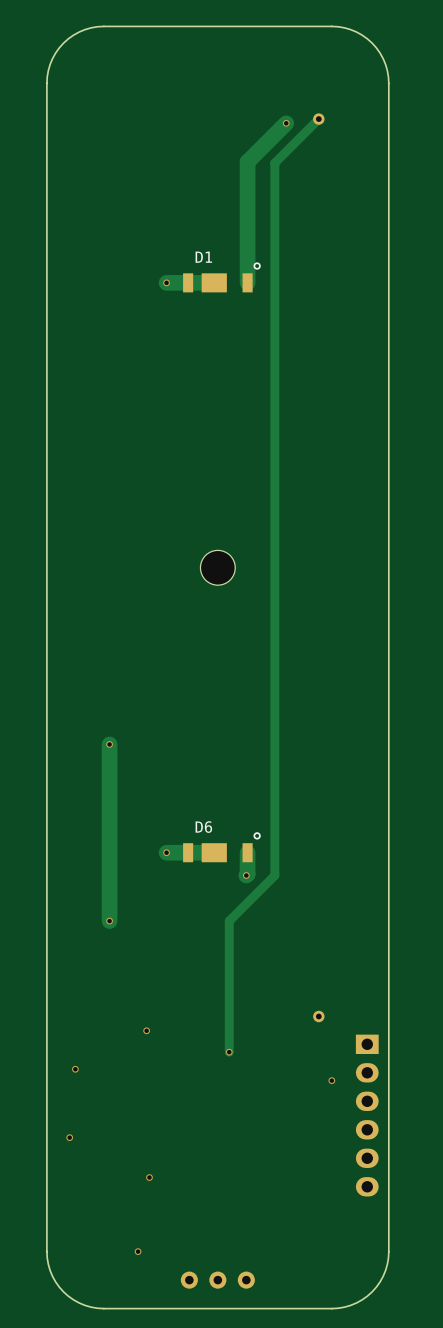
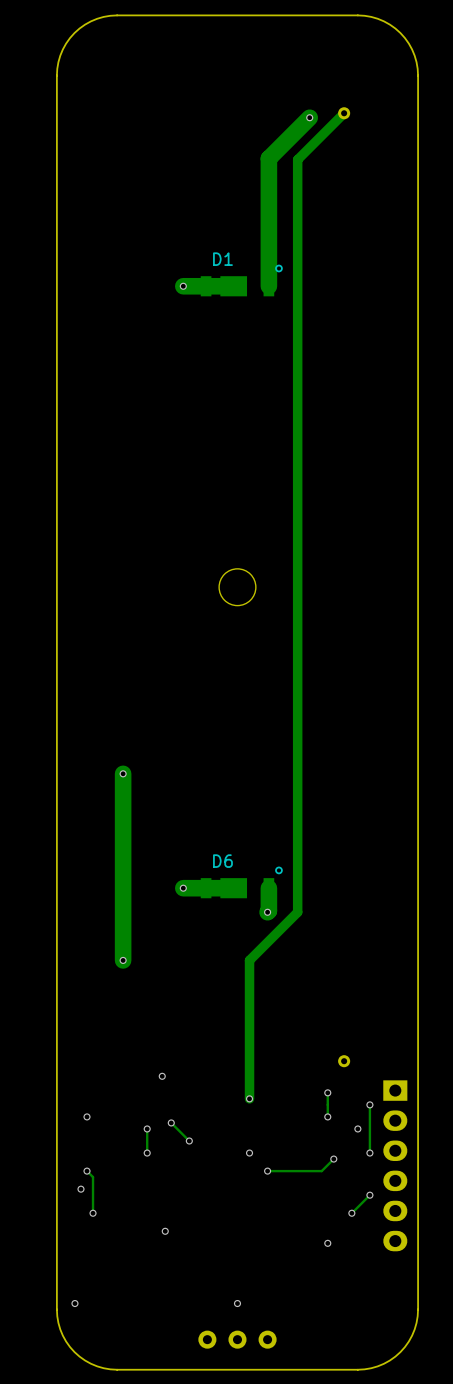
track: none -> (327, 1092) (327, 1116)
via: none -> (327, 1092)
track: none -> (369, 1104) (369, 1153)
via: none -> (369, 1104)
via: none -> (327, 1116)
track: none -> (171, 1122) (189, 1141)
via: none -> (171, 1122)
track: none -> (147, 1128) (147, 1153)
via: none -> (147, 1128)
via: none -> (189, 1141)
via: none -> (147, 1153)
via: none -> (249, 1153)
via: none -> (369, 1153)
track: none -> (333, 1159) (321, 1171) (267, 1171)
via: none -> (333, 1159)
track: none -> (87, 1171) (93, 1177) (93, 1213)
via: none -> (87, 1171)
via: none -> (267, 1171)
track: none -> (369, 1195) (351, 1213)
via: none -> (369, 1195)
via: none -> (93, 1213)
via: none -> (351, 1213)
via: none -> (327, 1243)
via: none -> (74, 1303)
via: none -> (237, 1303)
via: (138, 1251) -> none

